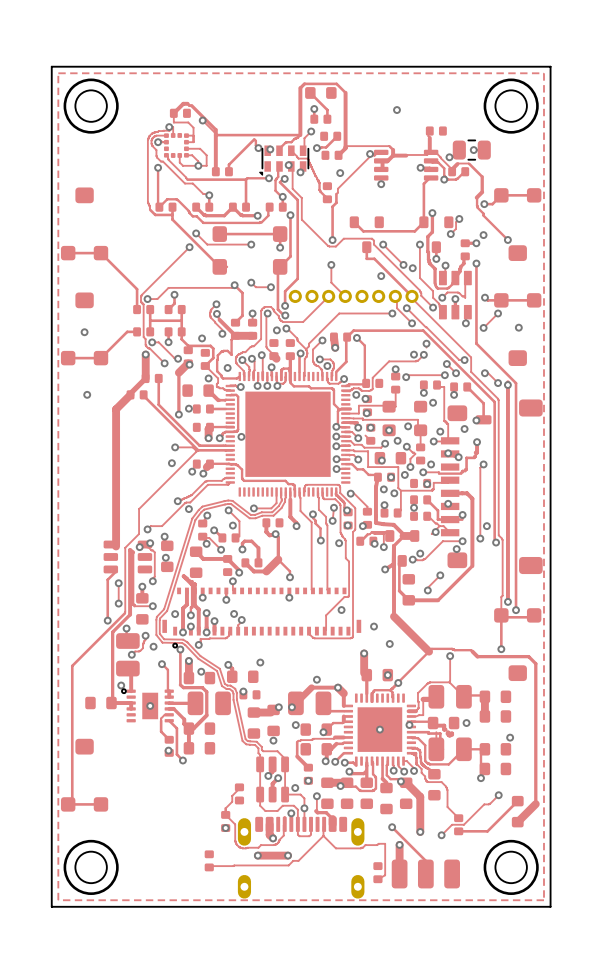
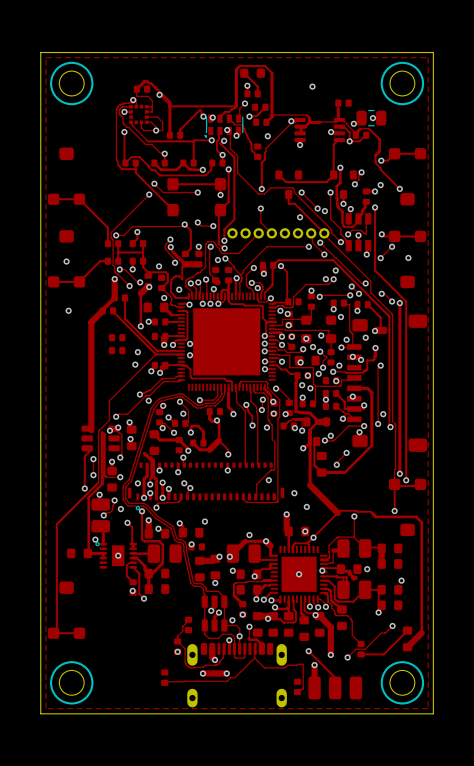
part: none -> (117, 337)
part: none -> (117, 350)
track: (175, 447) (192, 447) (196, 451) -> none
via: none -> (190, 355)

